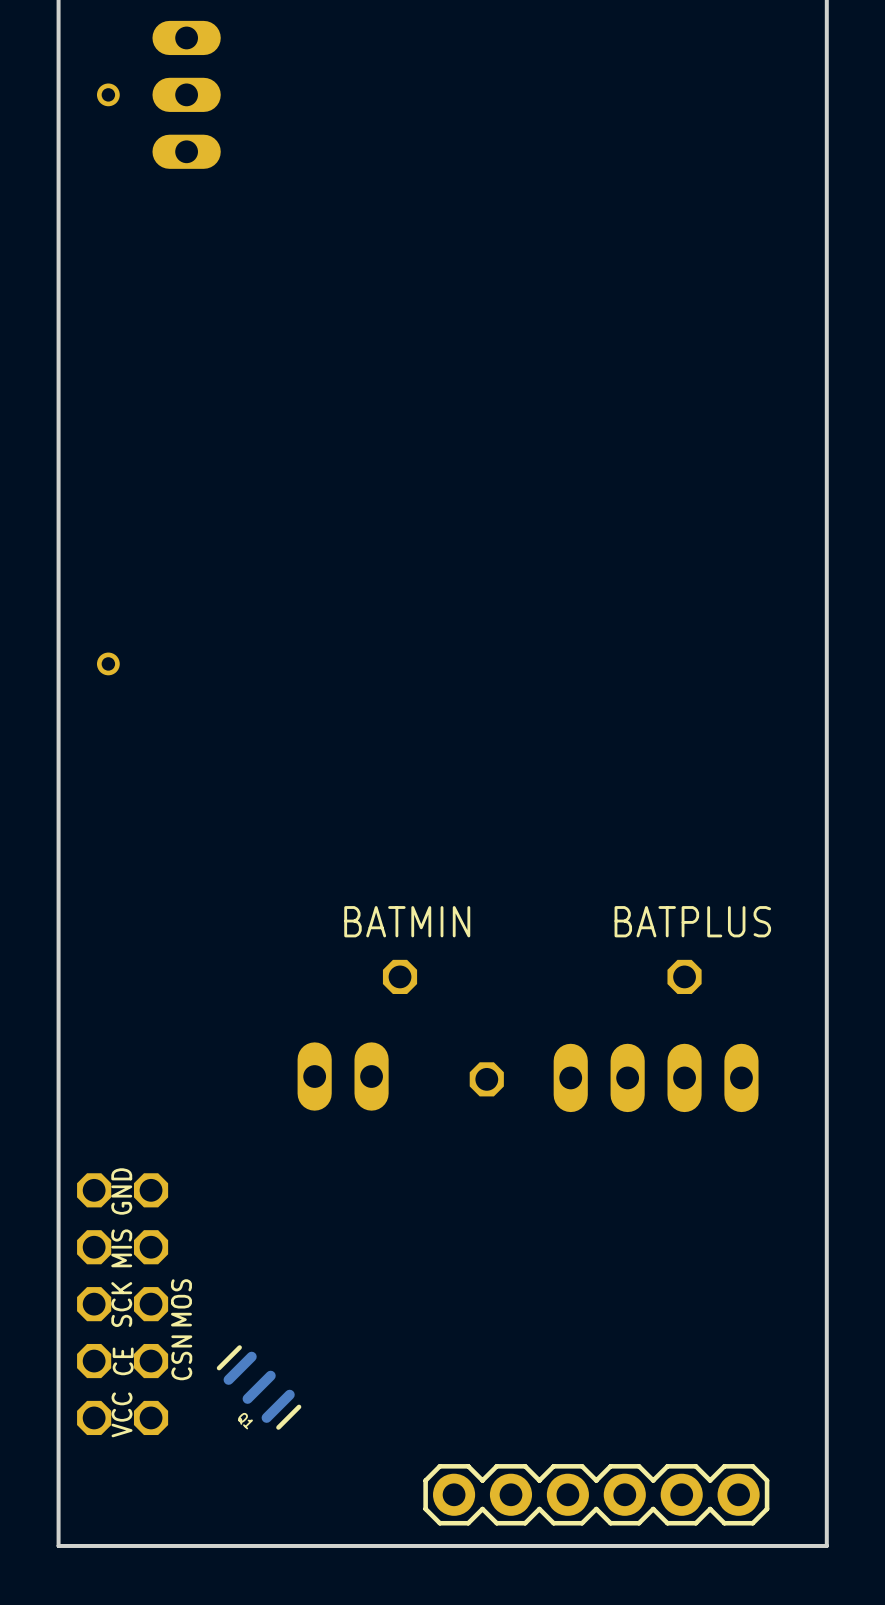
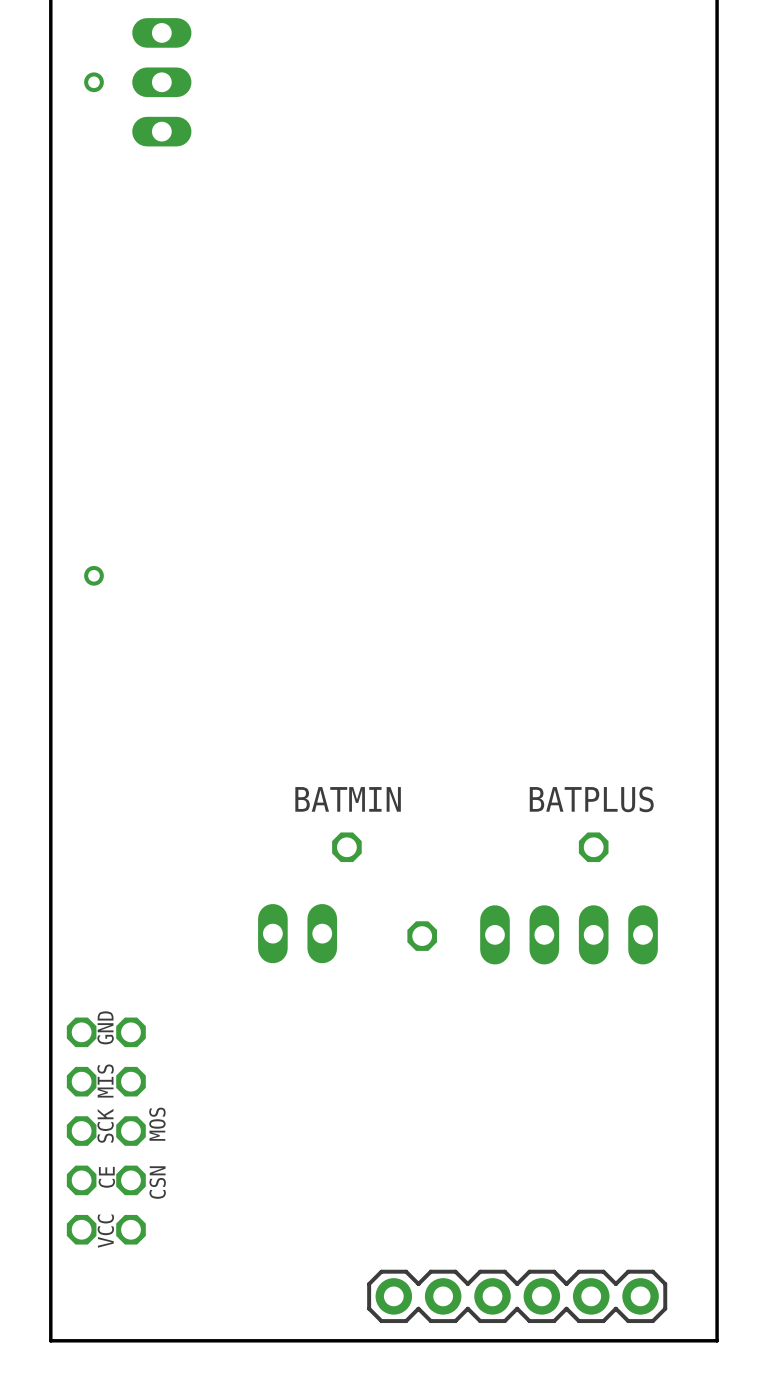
Q1: (259, 1387) -> none

